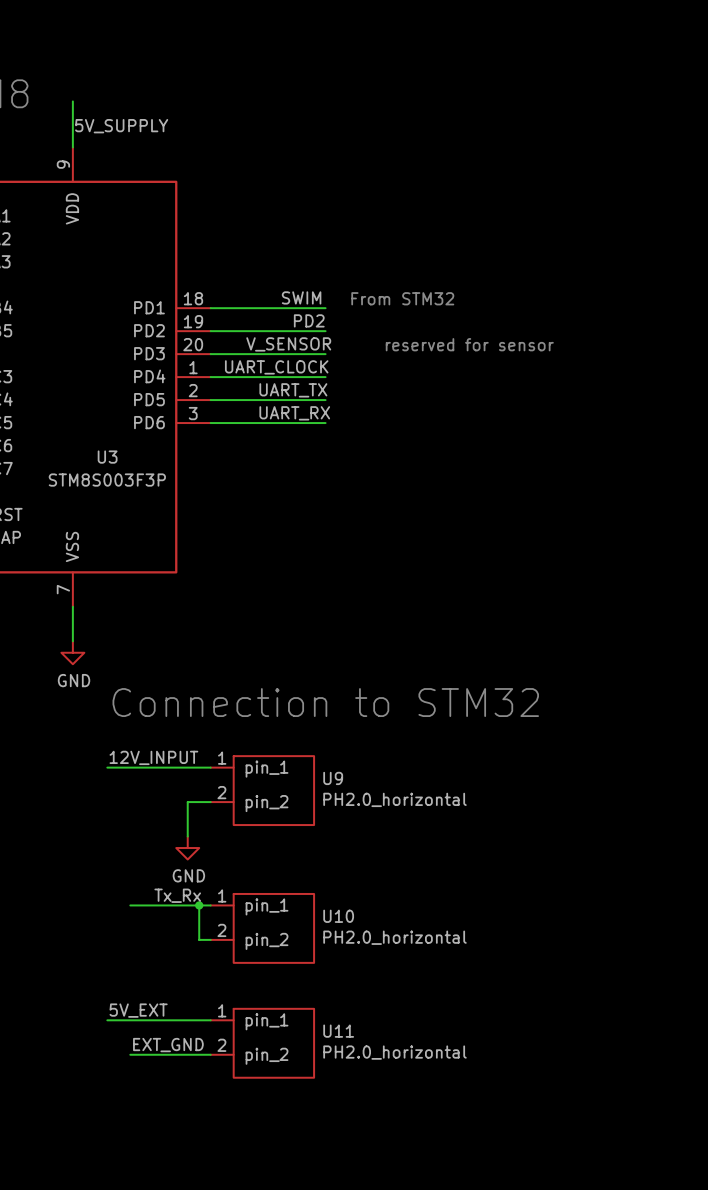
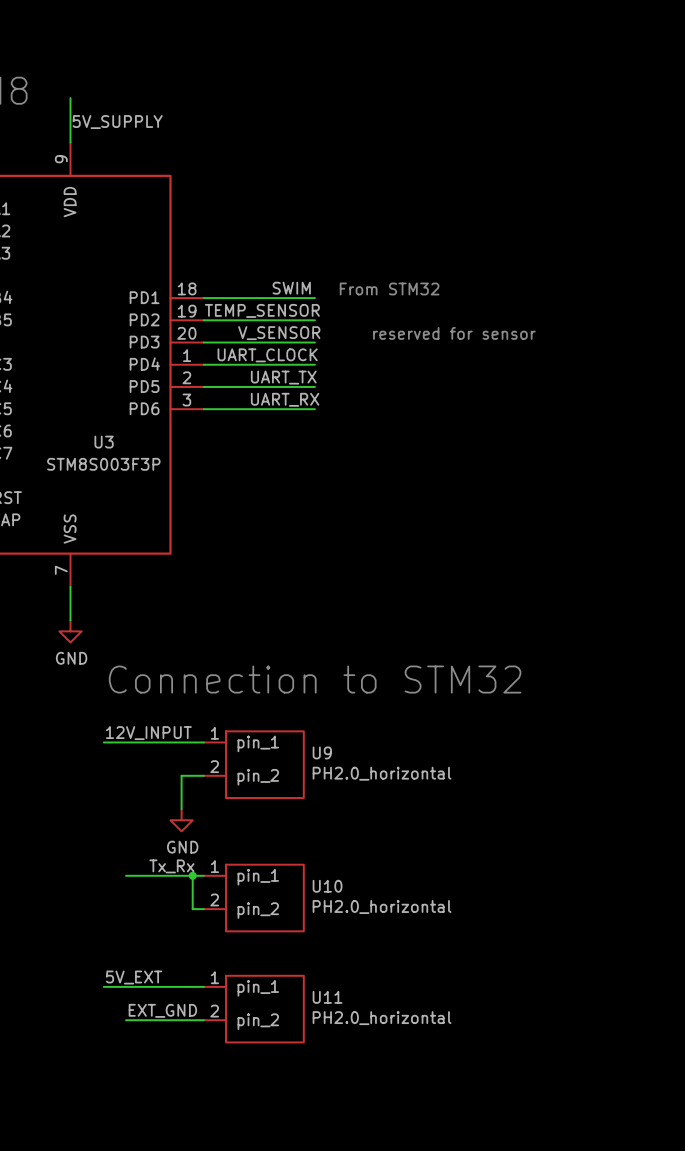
label: PD2 (309, 320) -> none
label: none -> TEMP_SENSOR (262, 310)

